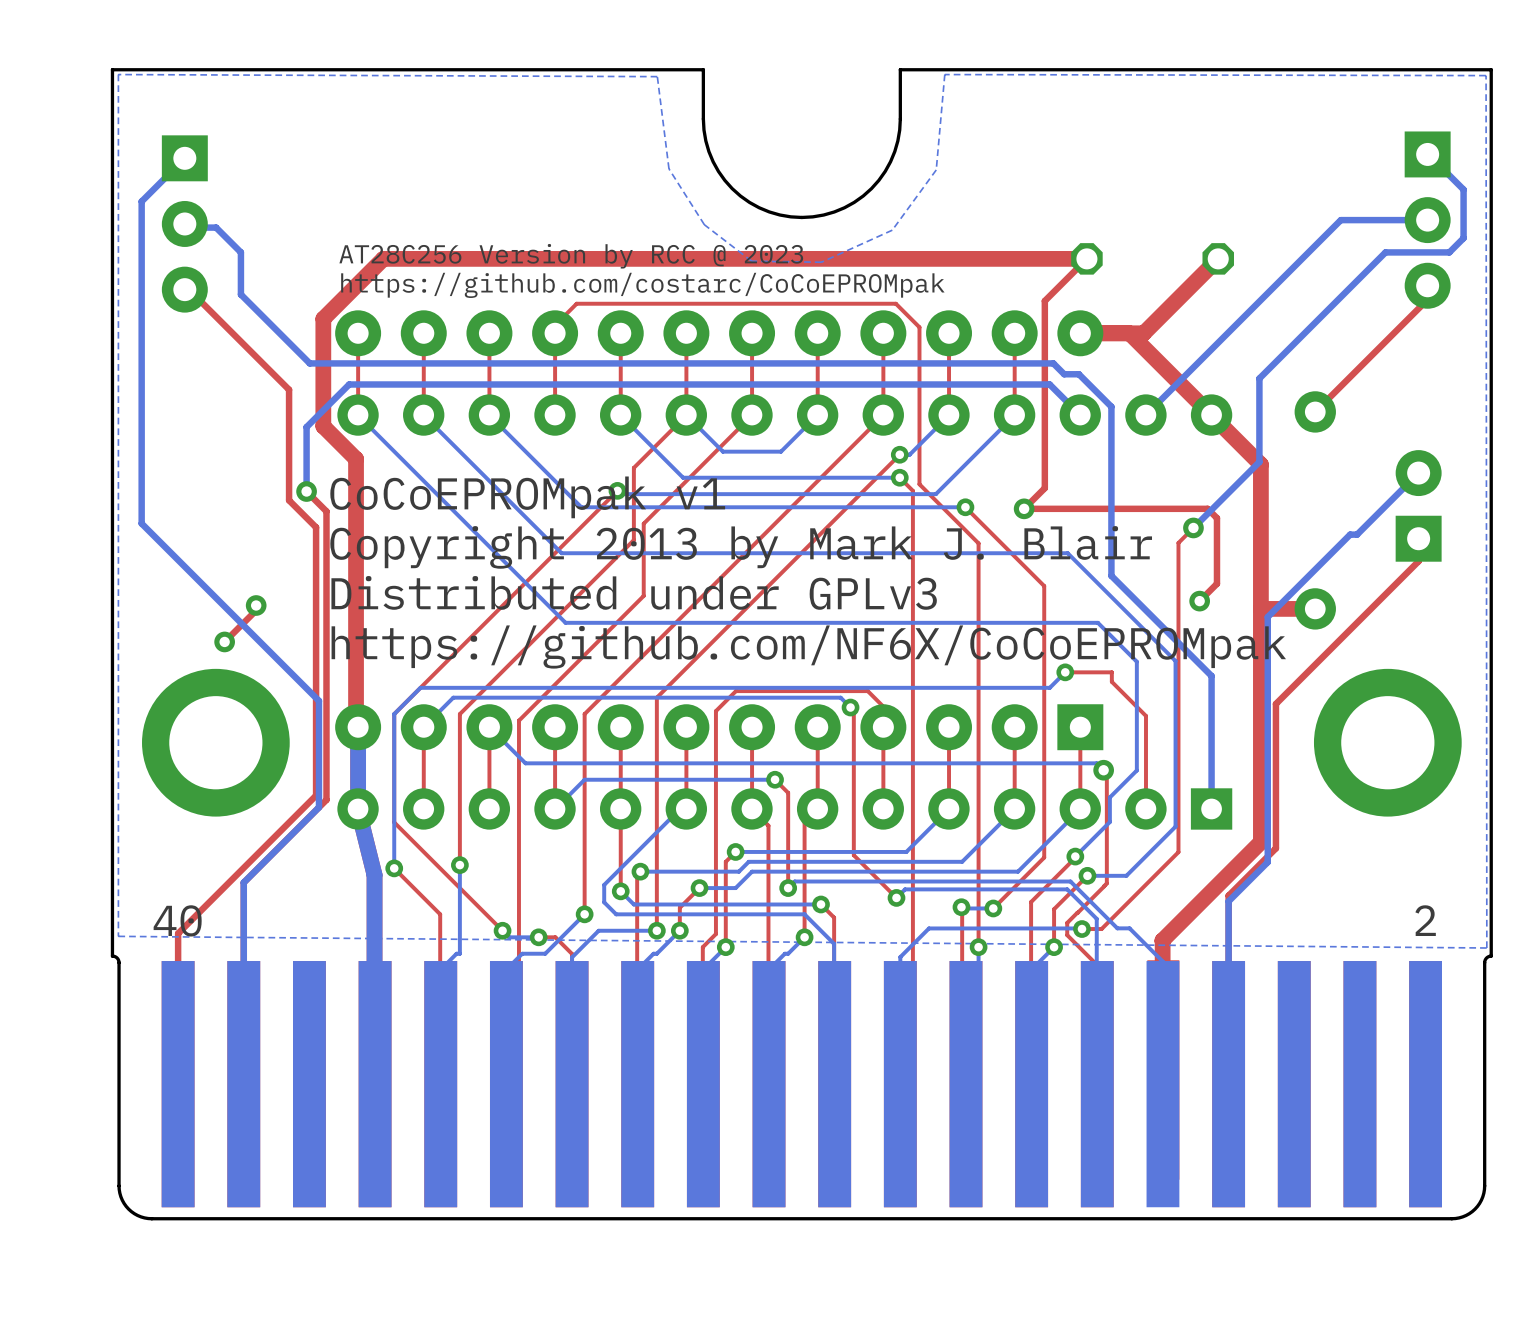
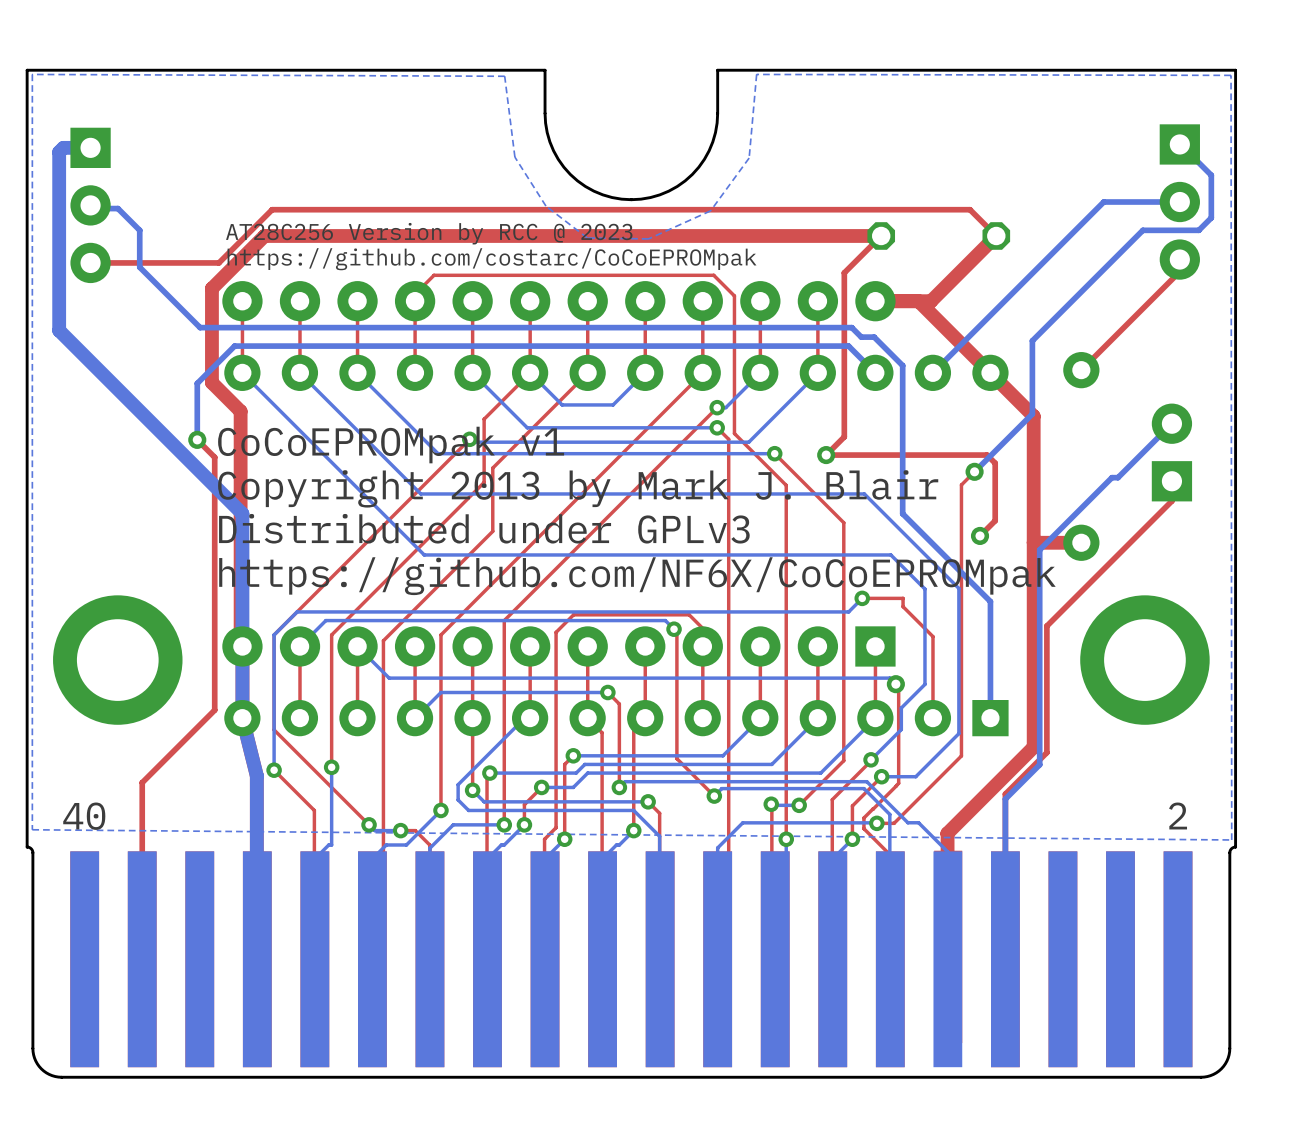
bottom track: (184, 158) (141, 201) (141, 523) (318, 700) (318, 807) (243, 882) (243, 1084) -> (90, 147) (63, 147) (59, 152) (59, 330) (242, 513) (242, 646)
top track: (188, 289) (289, 389) (289, 500) (316, 527) (316, 795) (178, 933) (178, 1084) -> (94, 262) (218, 262) (272, 209) (970, 209) (996, 235)
top track: (256, 605) (256, 610) (224, 641) -> none
via: (256, 605) -> none
via: (224, 641) -> none

